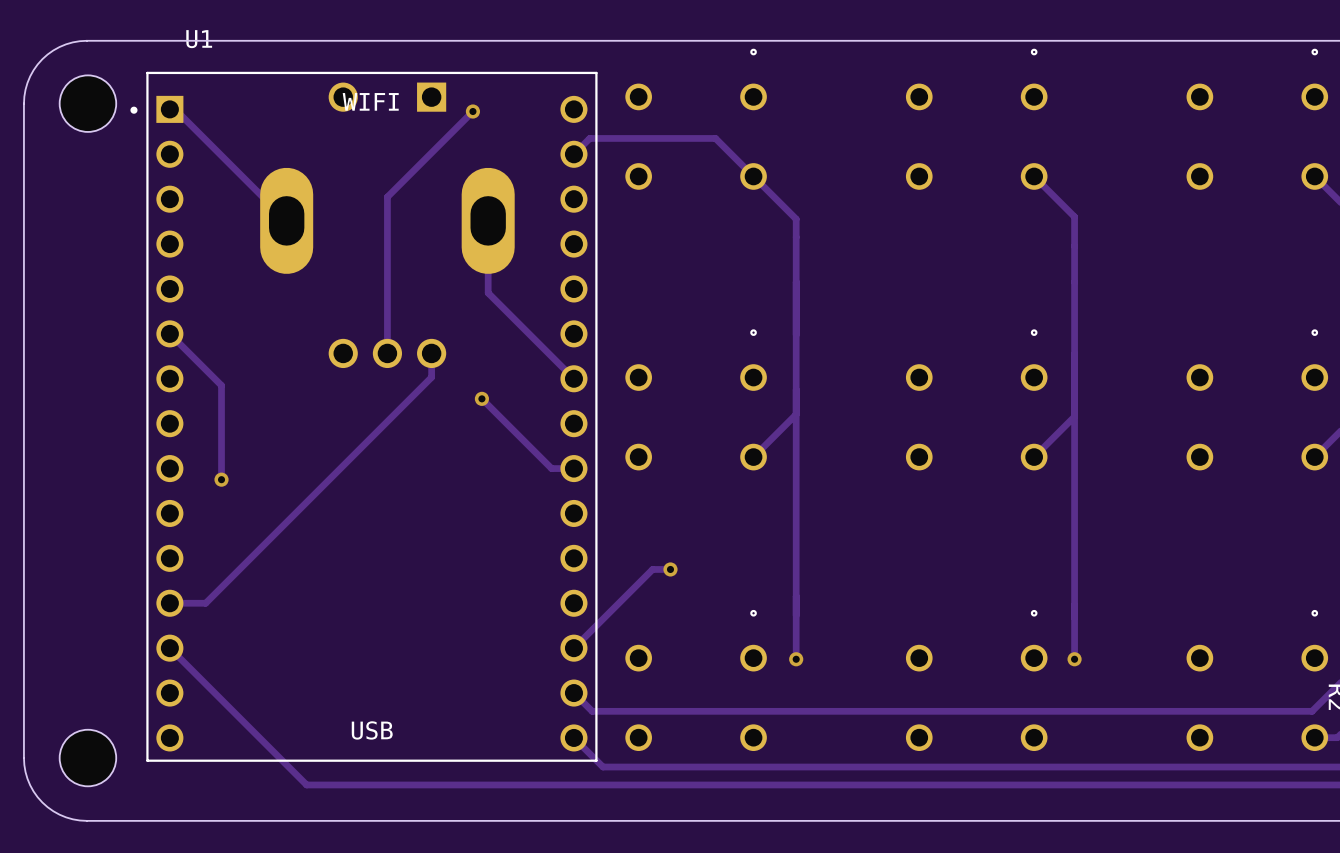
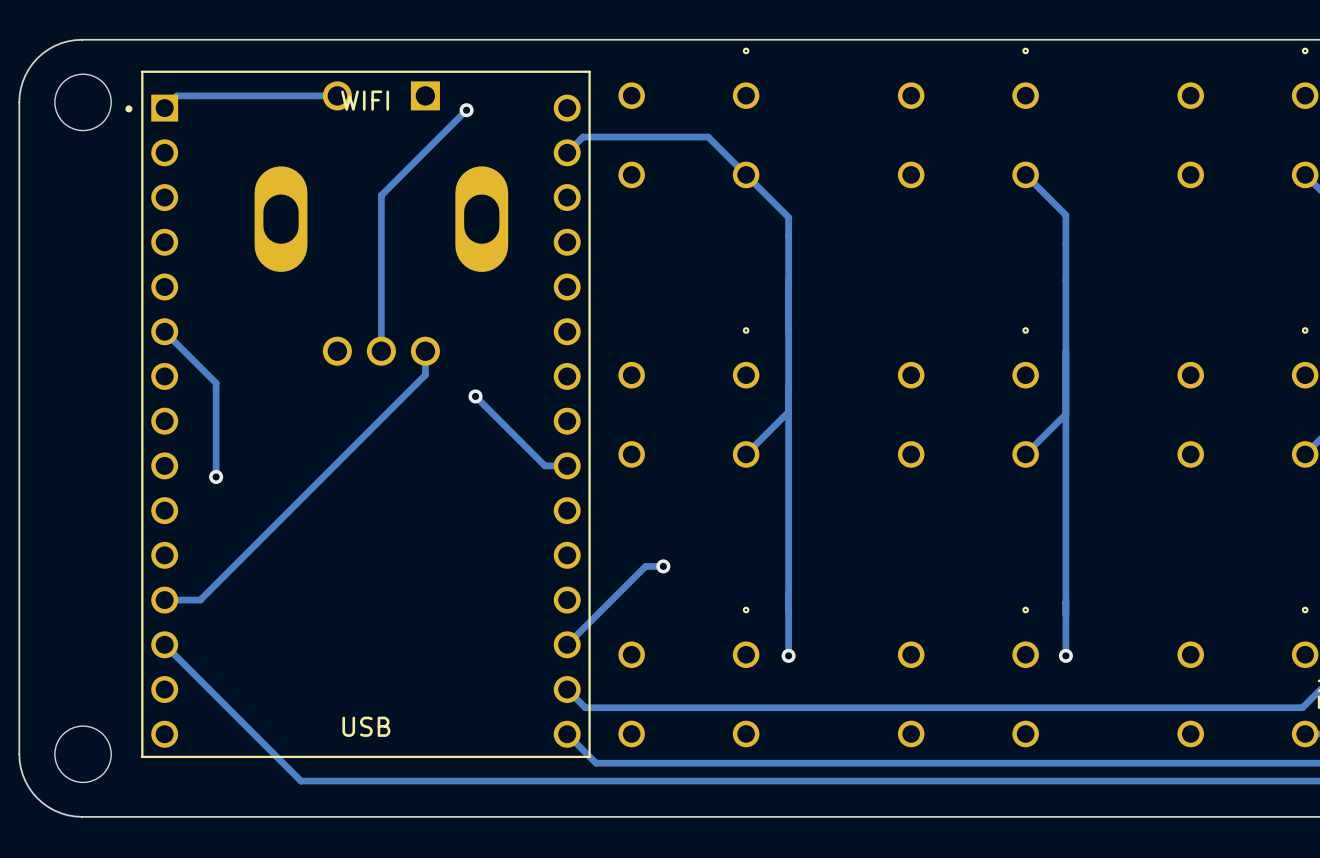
U1 name: U1 (199, 39) -> none
track: none -> (337, 95) (176, 95) (164, 108)
track: (175, 109) (286, 220) -> none
track: (488, 220) (488, 293) (573, 378) -> none

